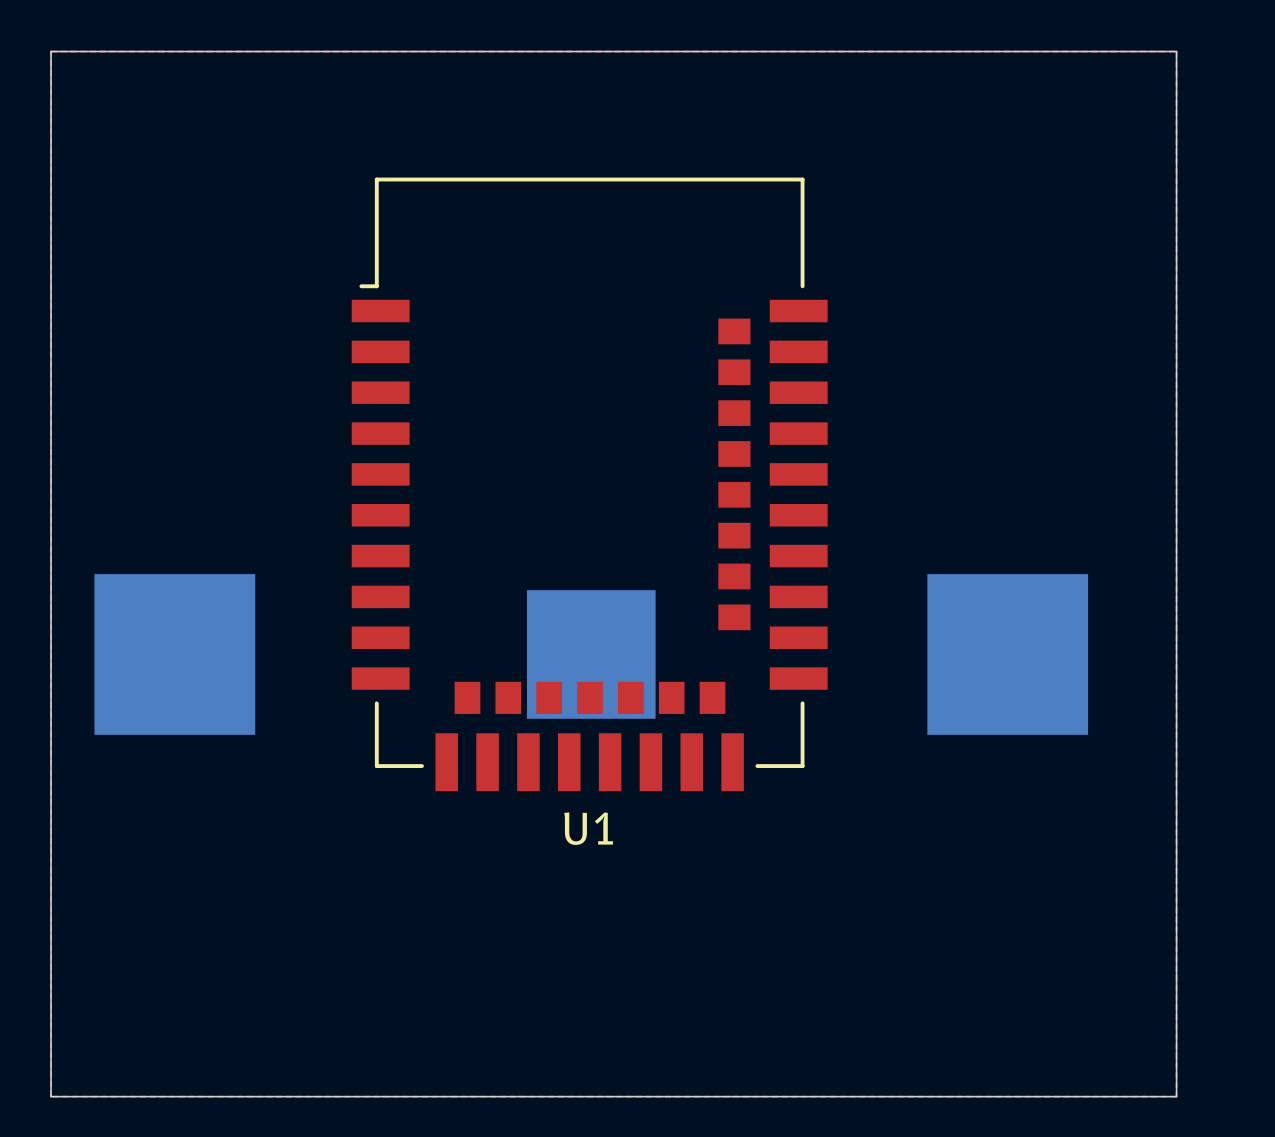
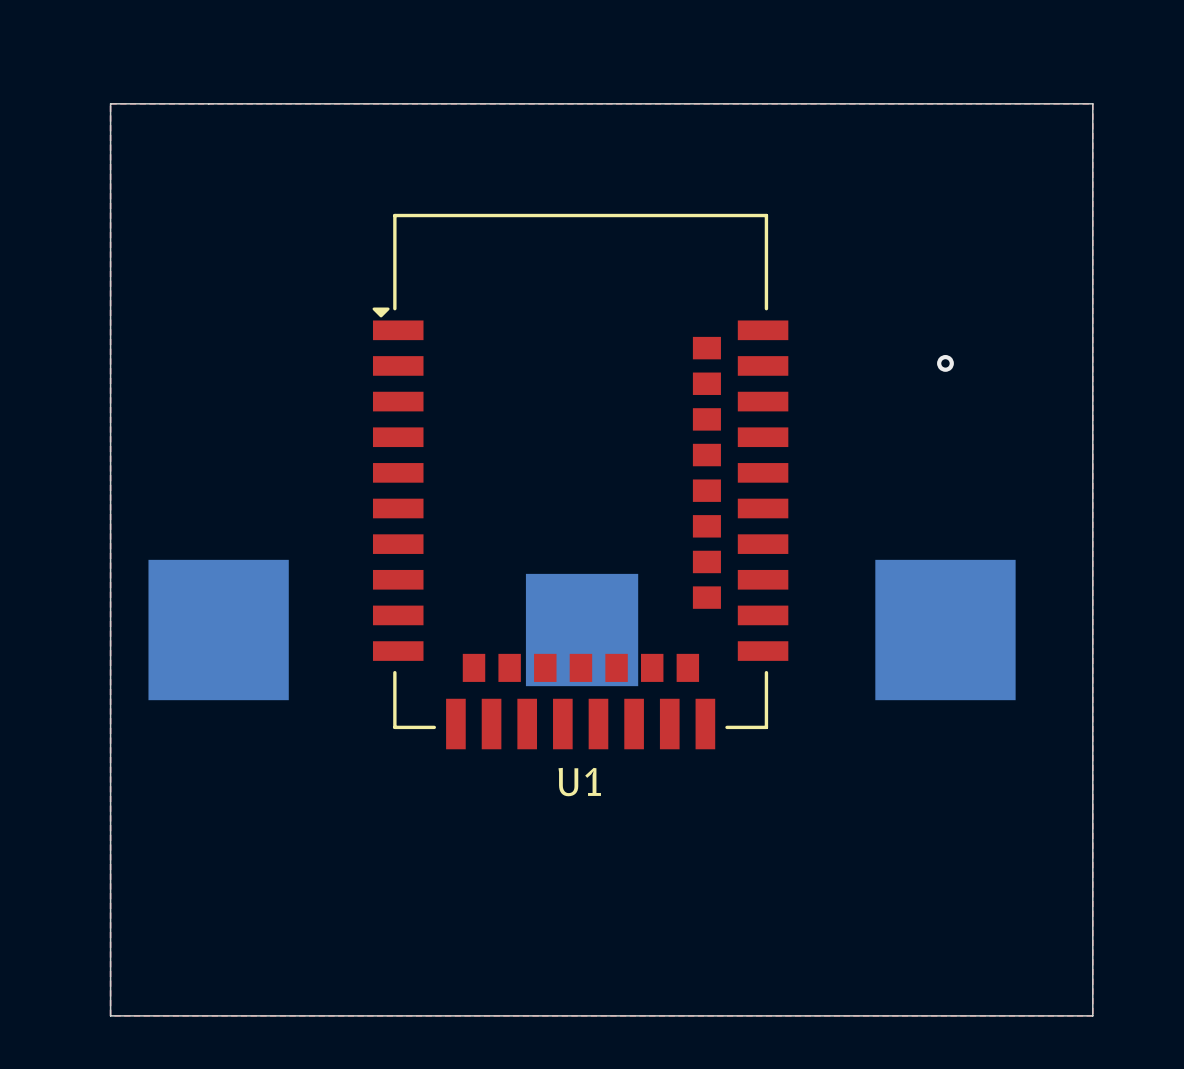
U1 footprint: [351, 177, 828, 792] -> [372, 213, 789, 750]
via: none -> (945, 363)

